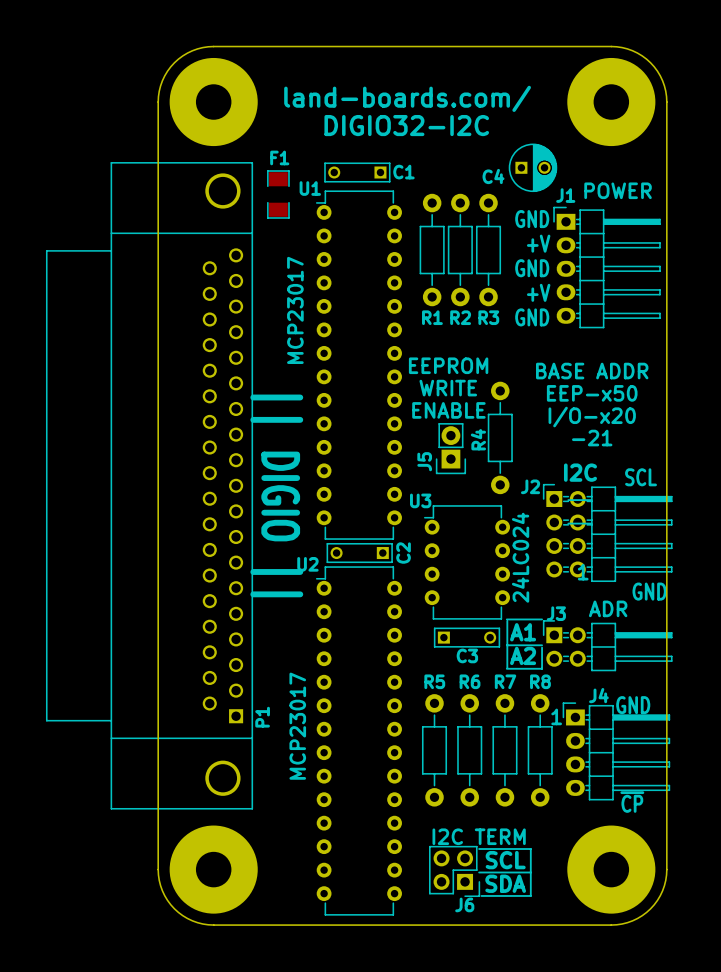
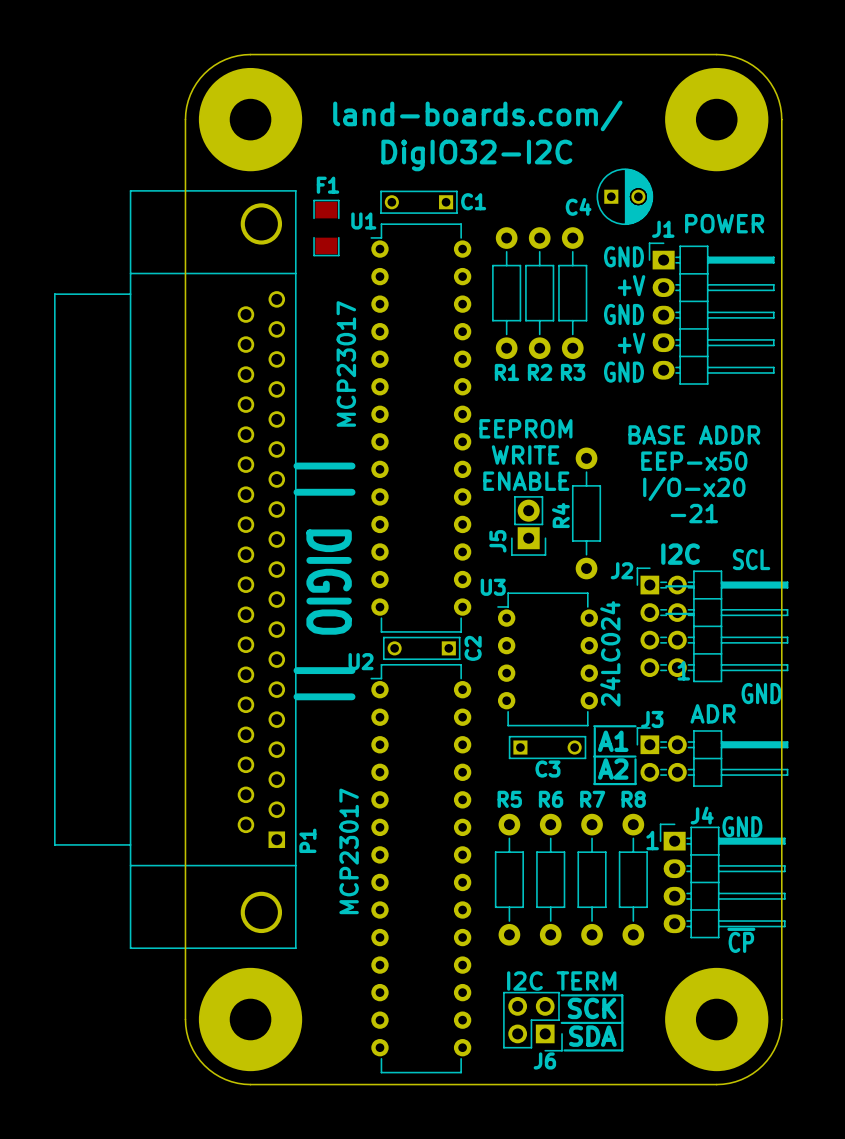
text: DIGIO32-I2C (406, 125) -> DigIO32-I2C (476, 155)
text: SCL (505, 860) -> SCK (592, 1008)

